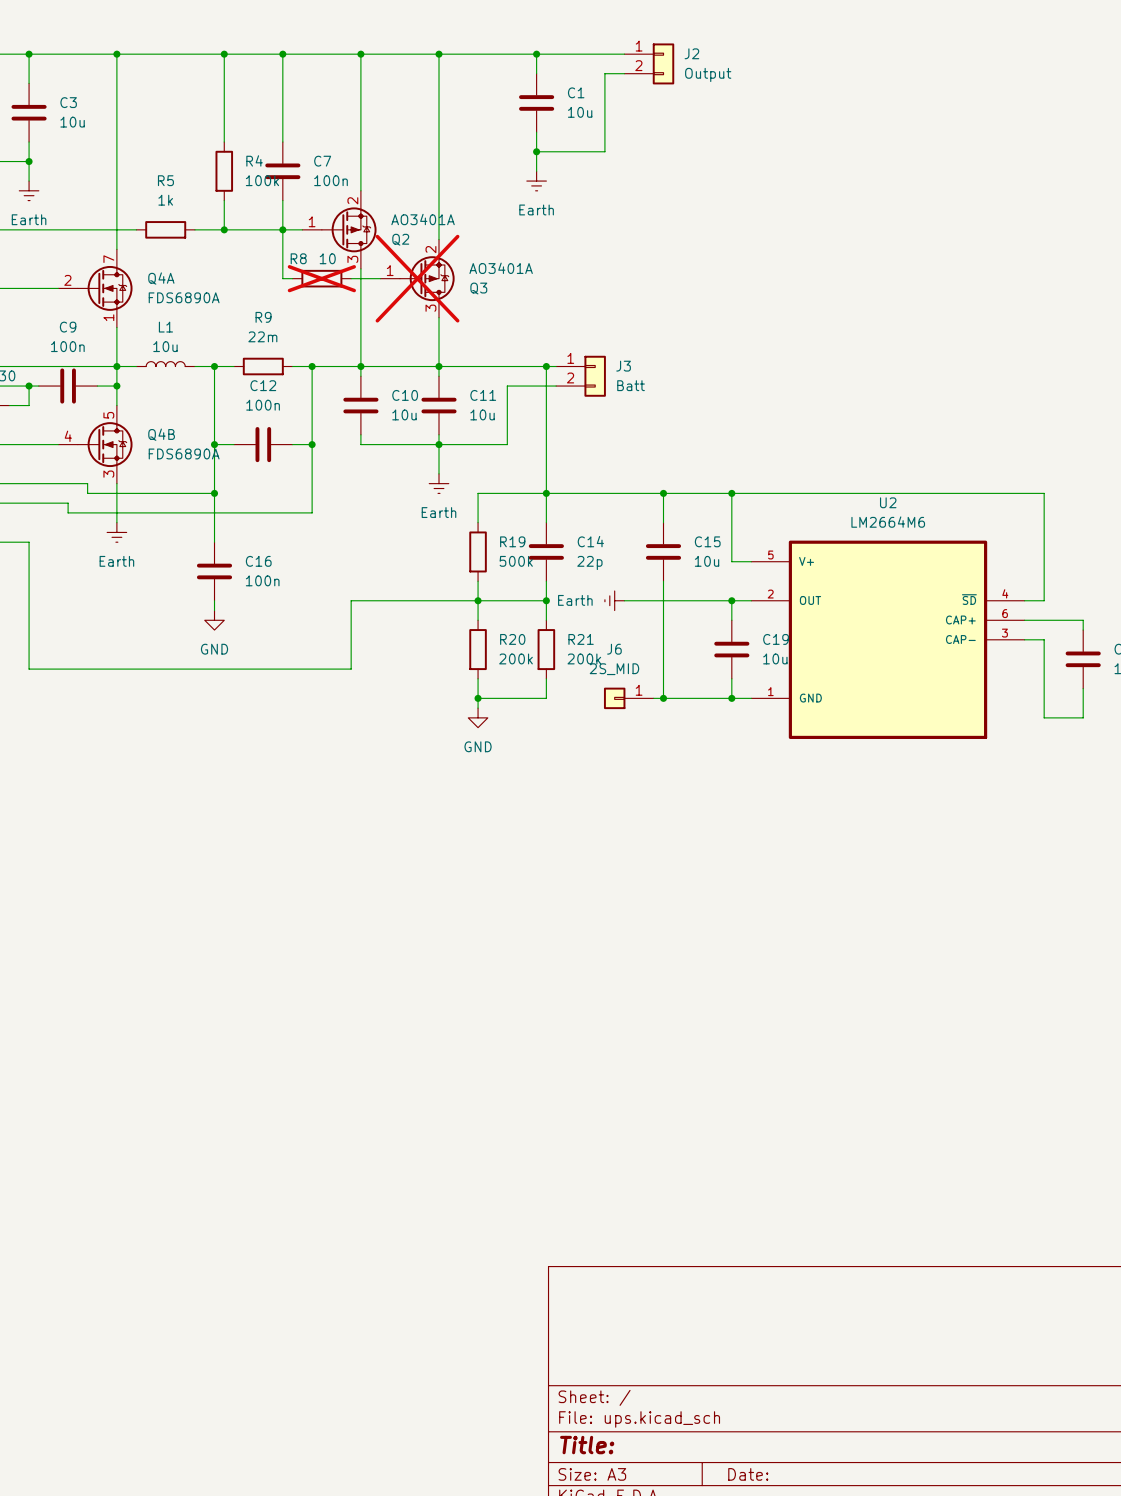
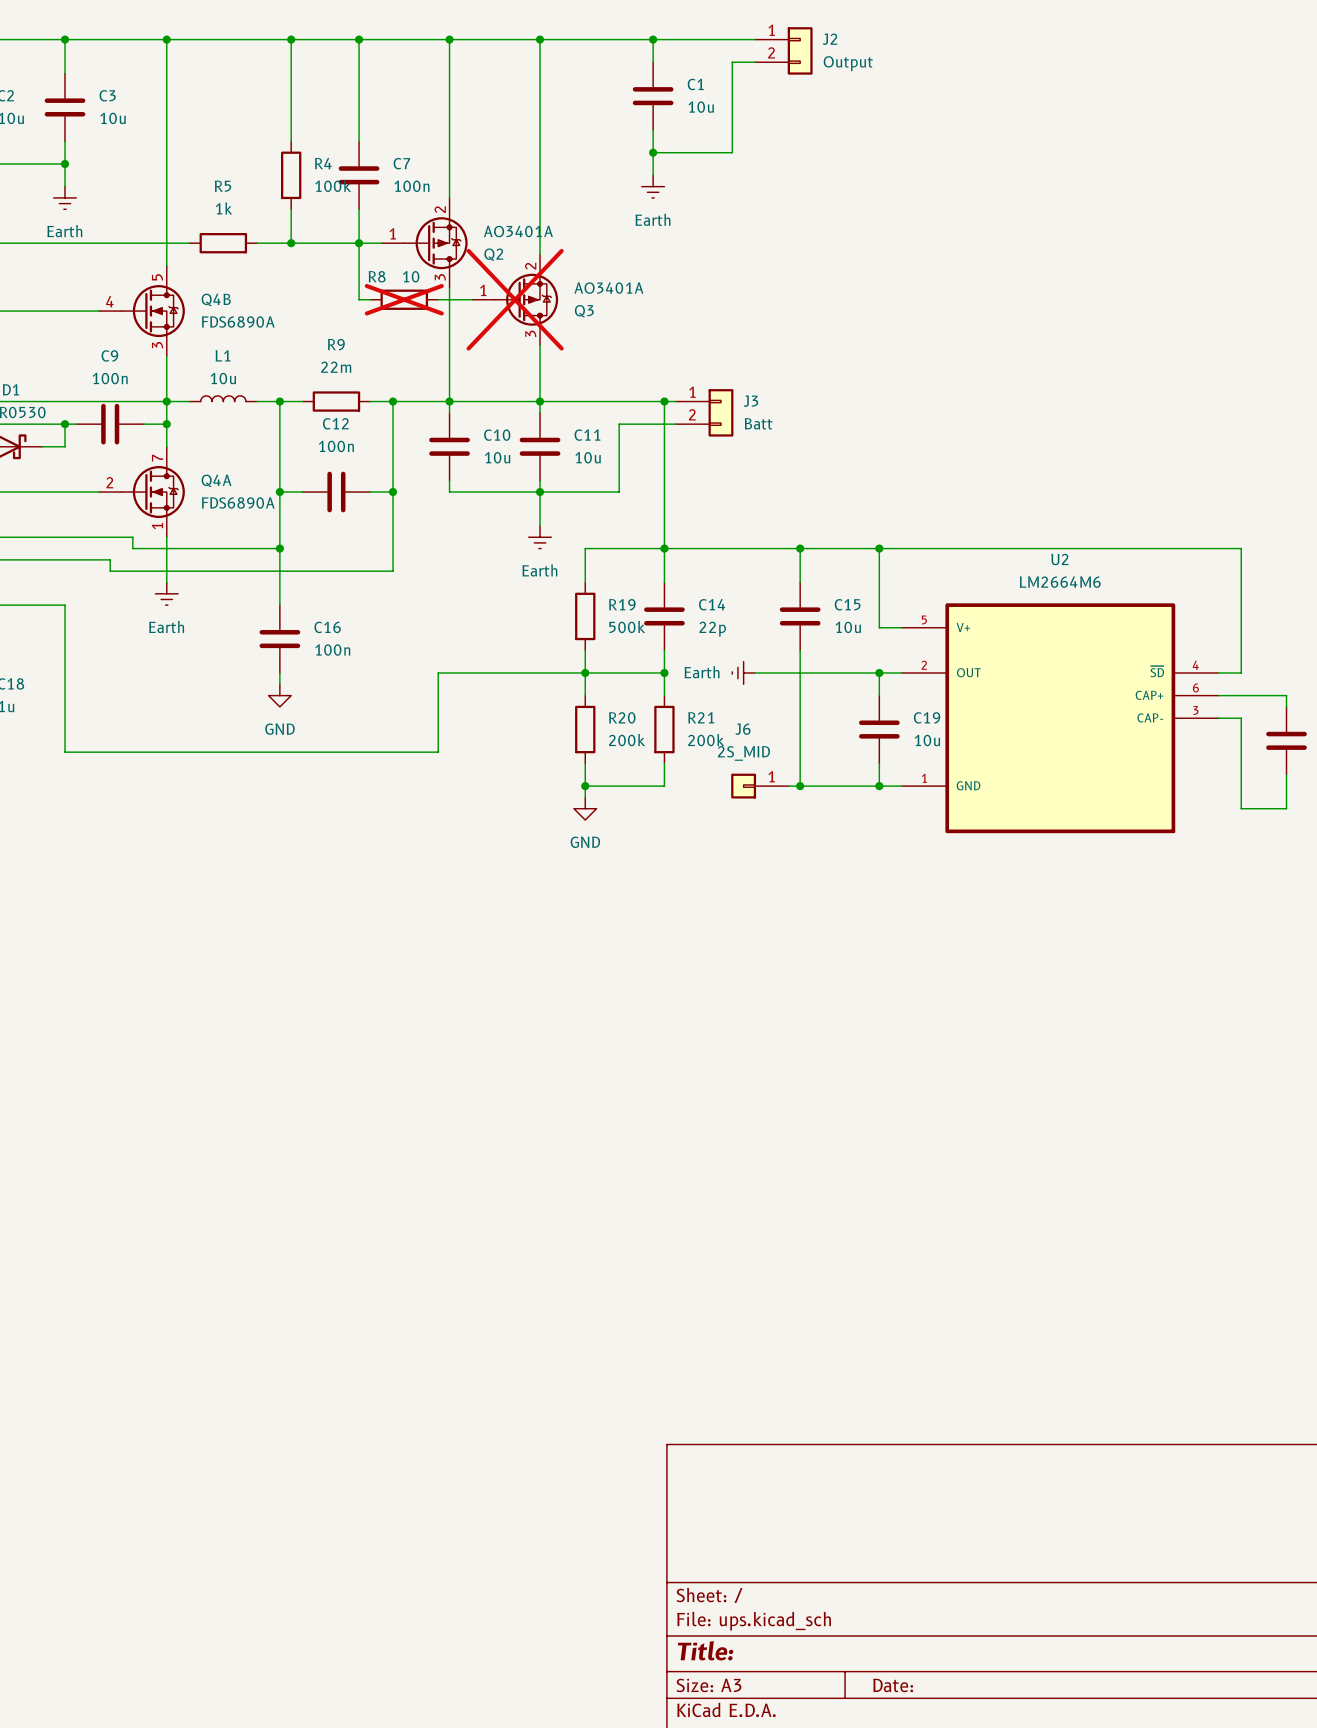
Q4A position: (95, 288) -> (141, 492)
Q4B position: (95, 444) -> (141, 311)

